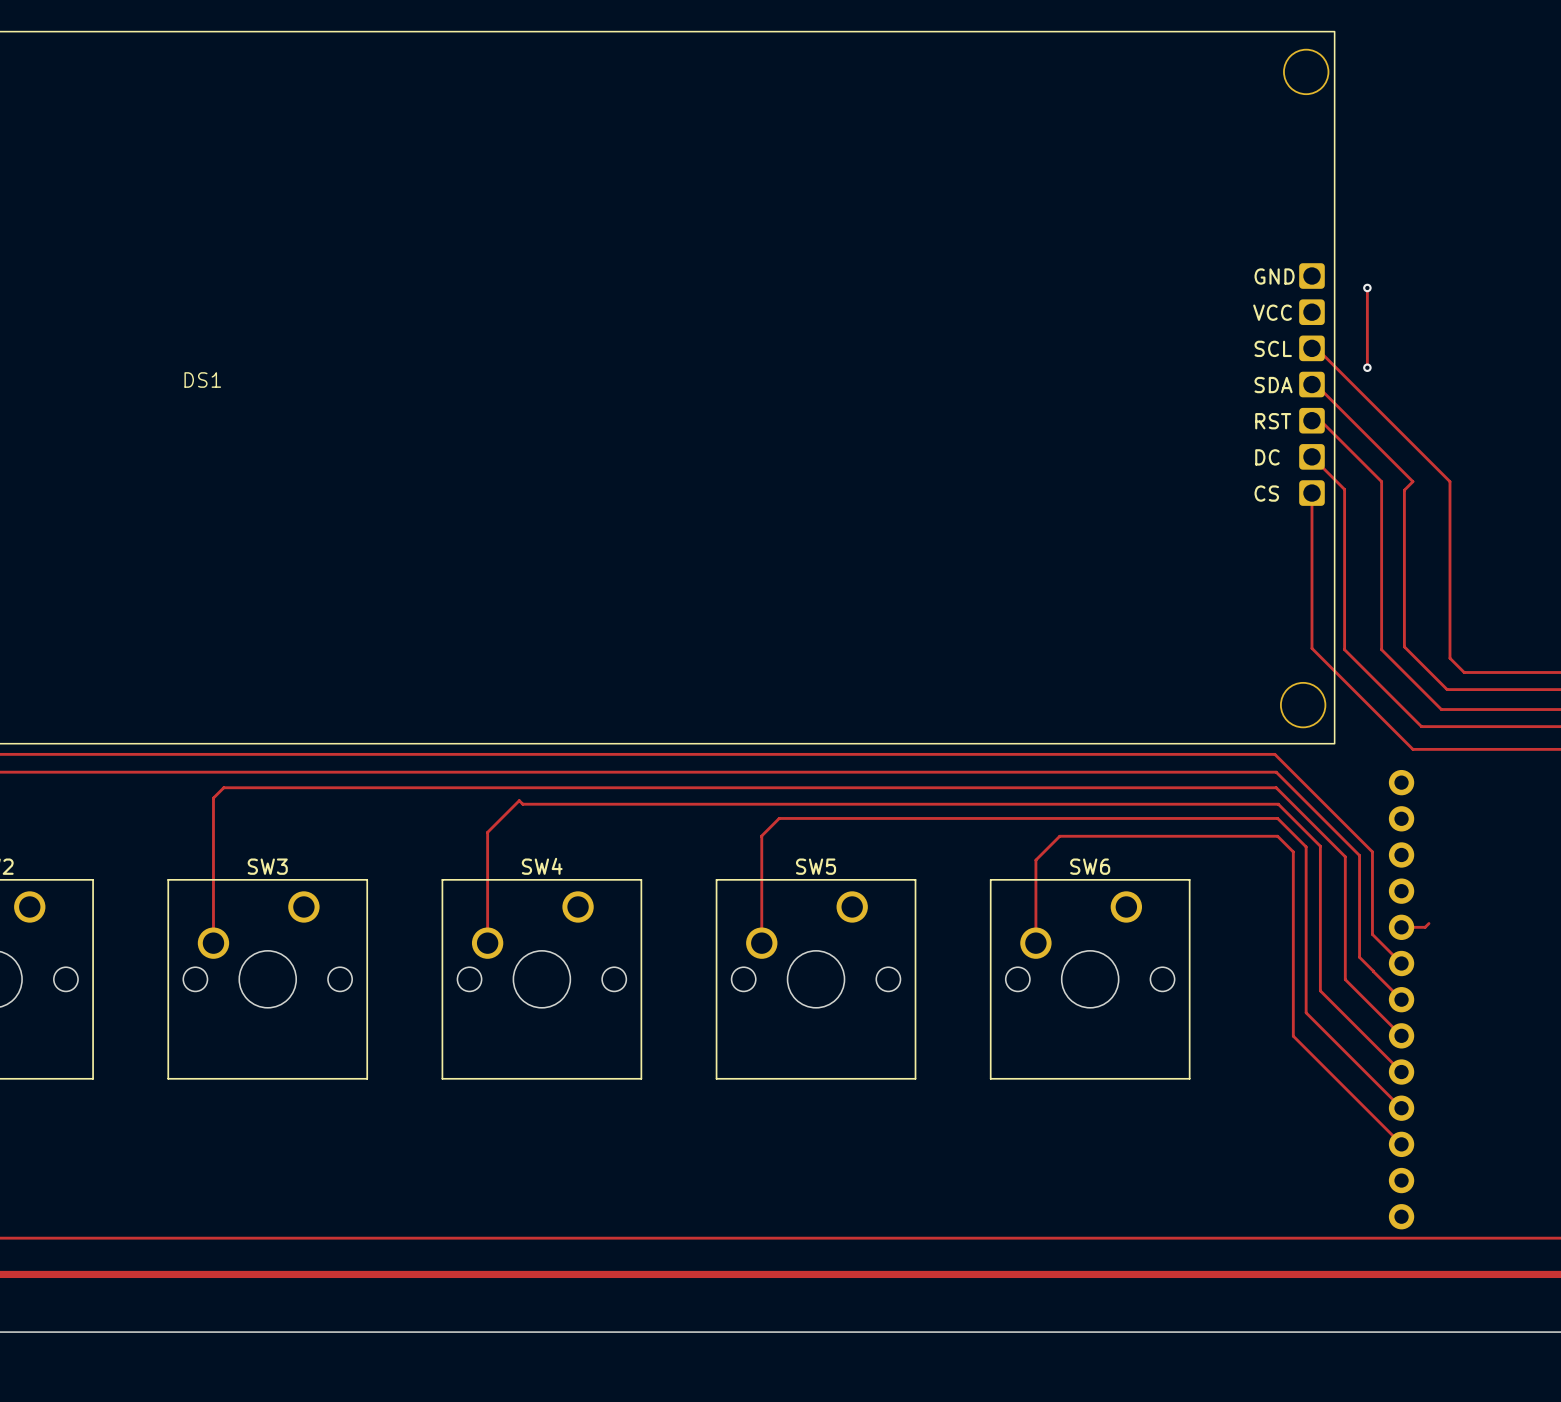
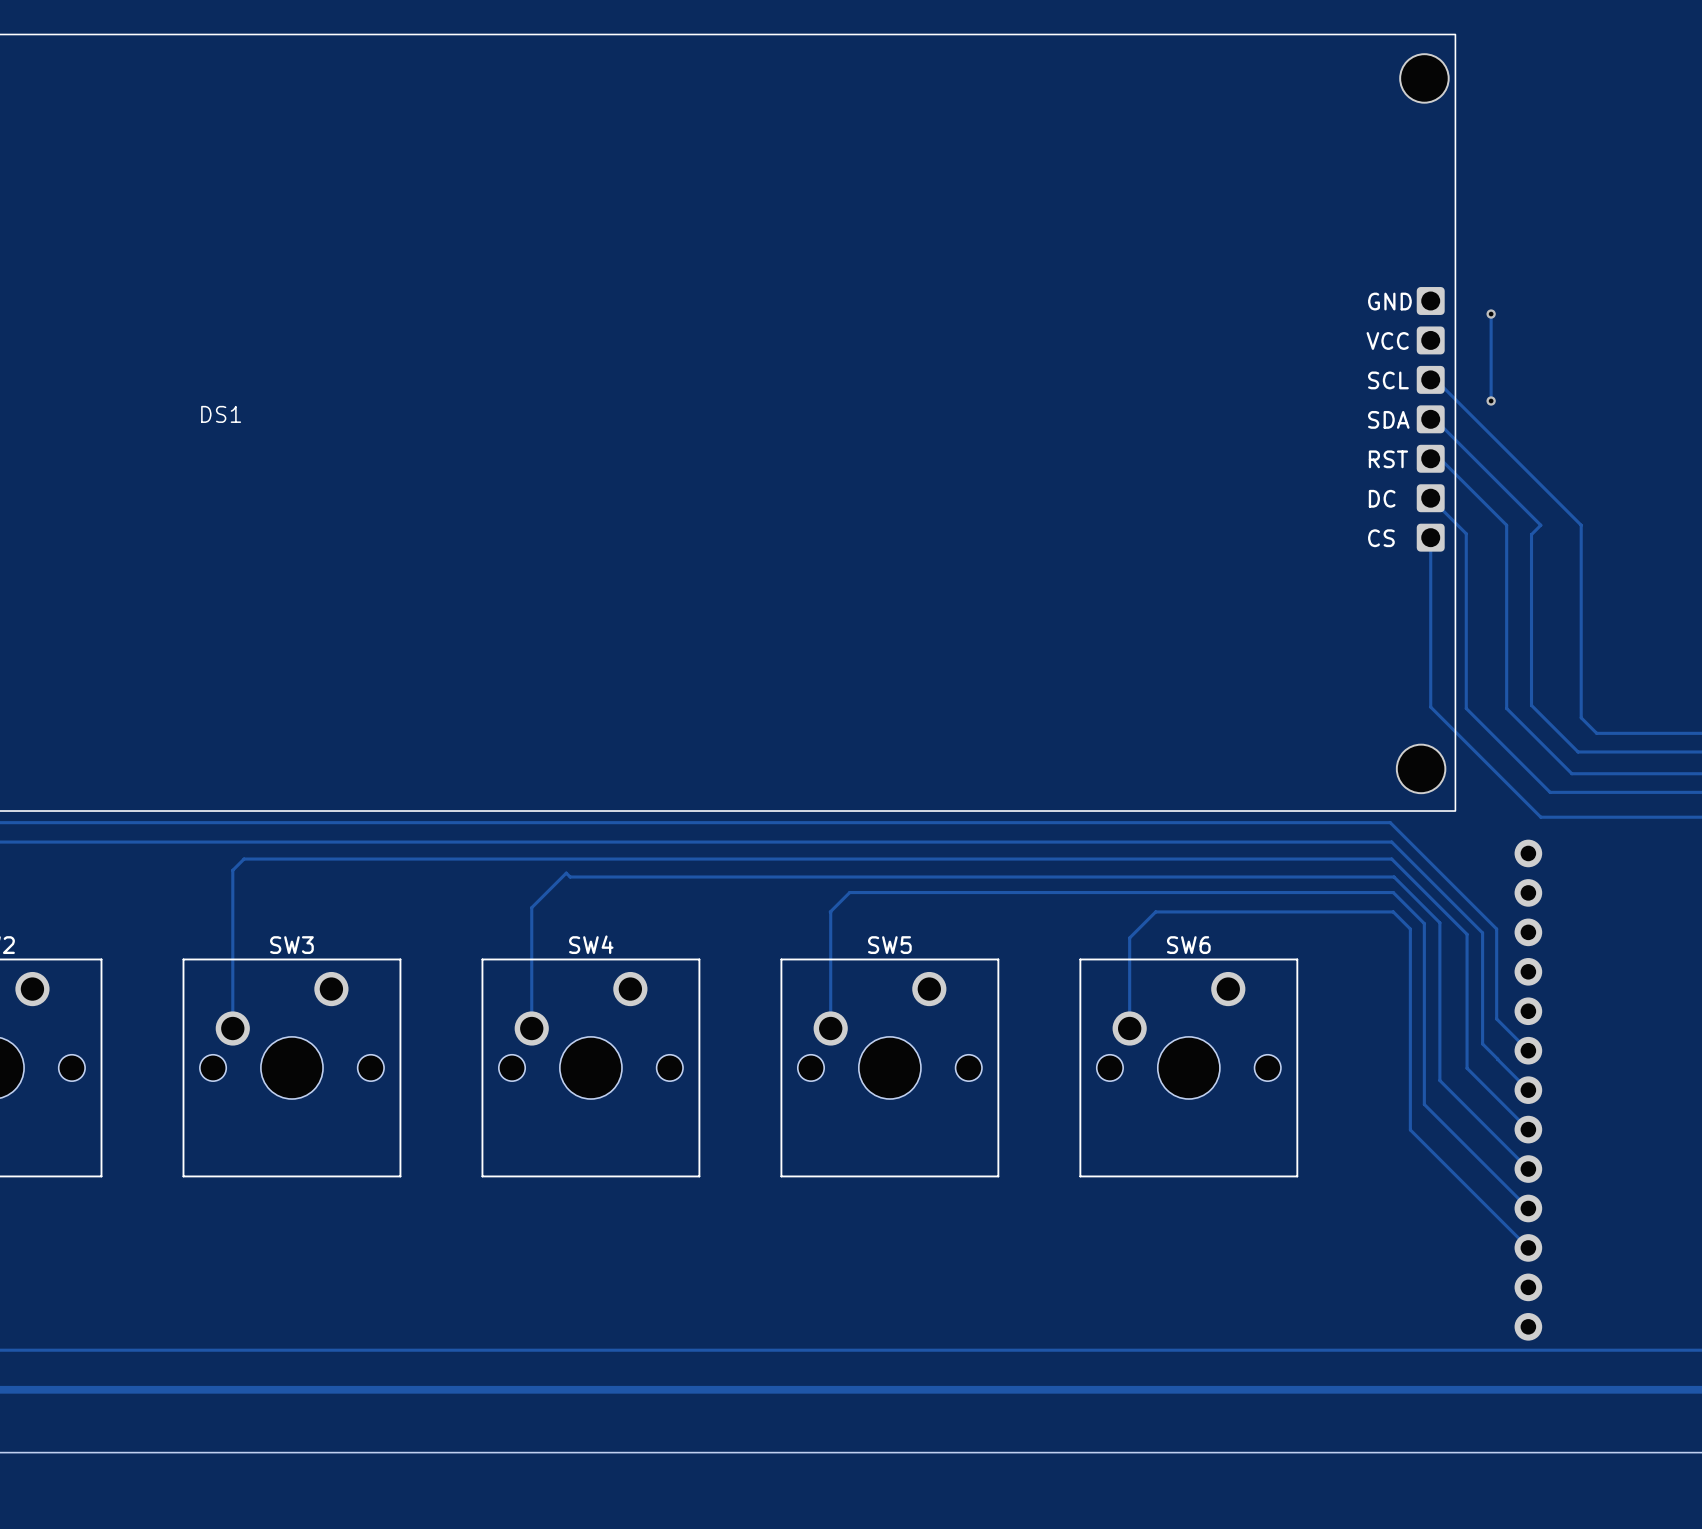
track: (1428, 923) (1425, 927) (1401, 927) -> none

